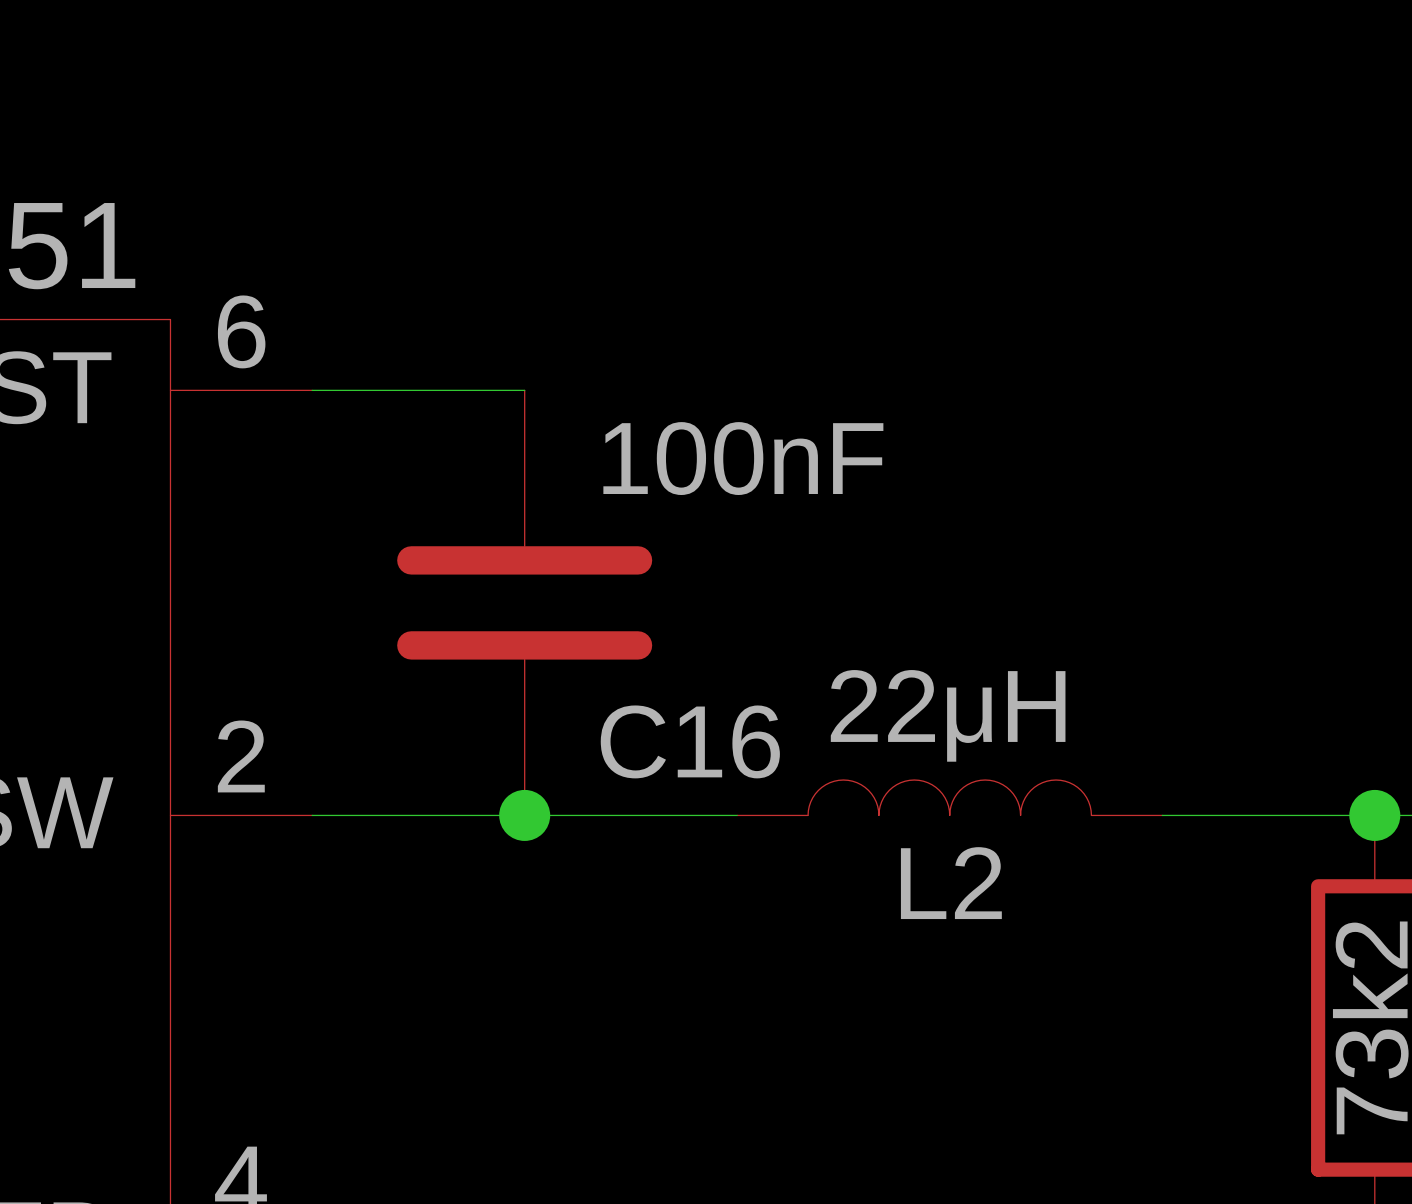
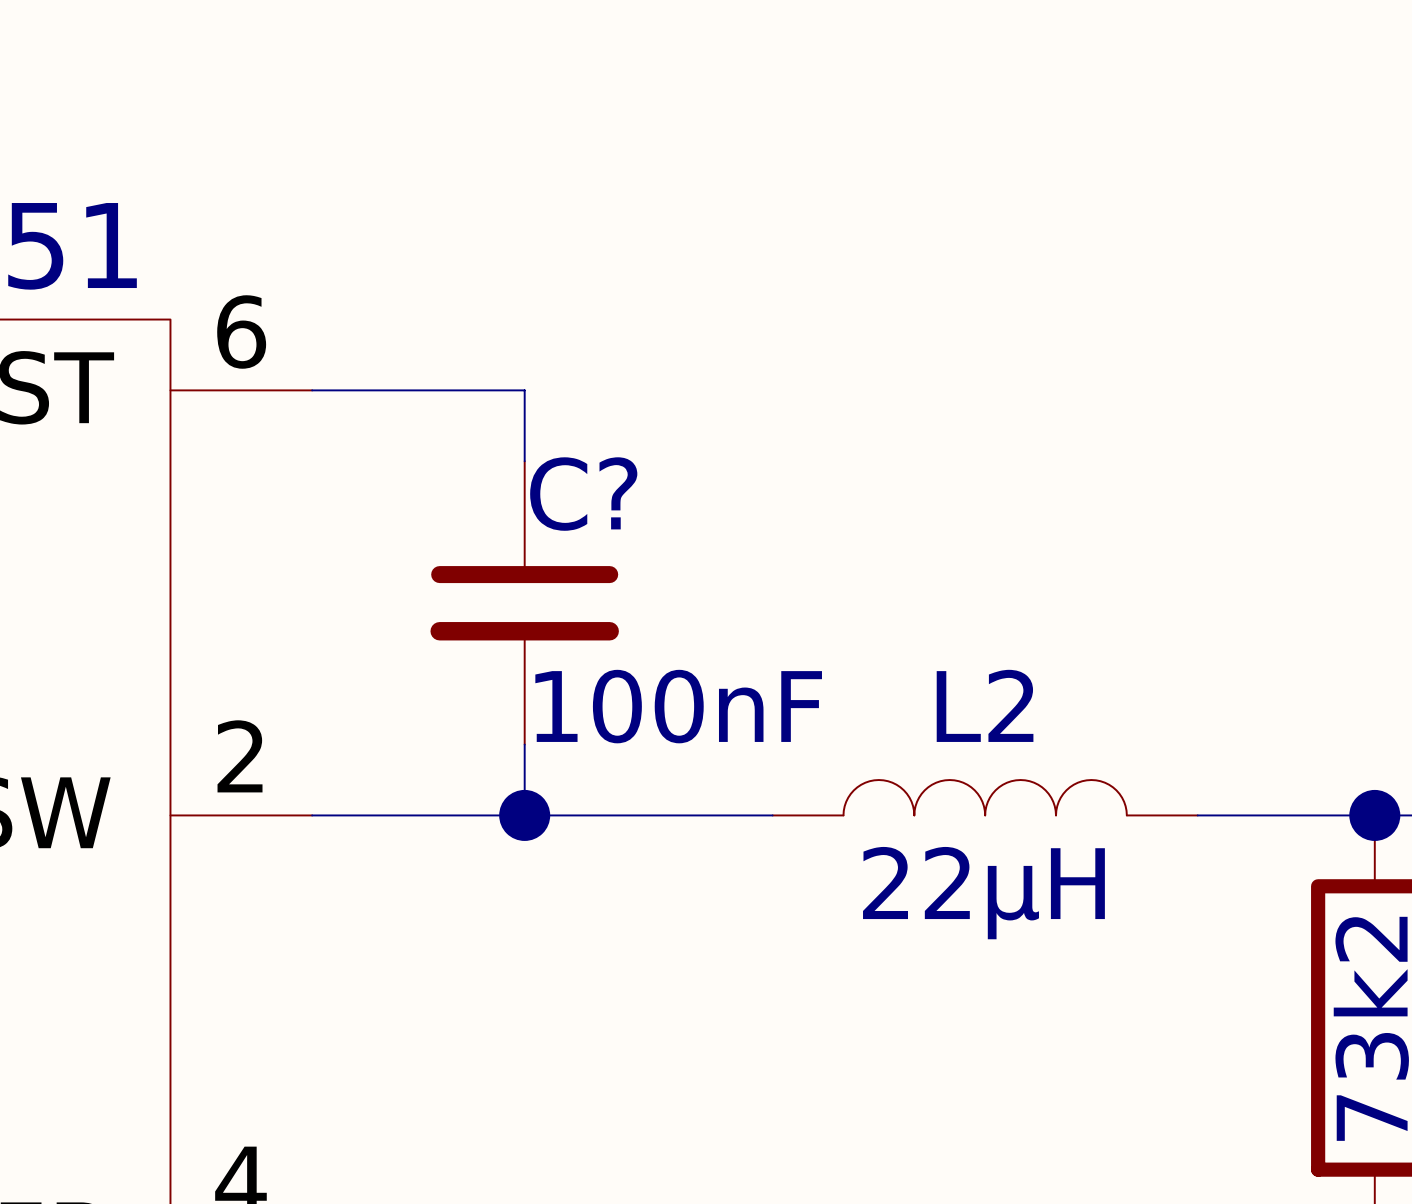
C16: 100nF (524, 602) -> none
C?: none -> 100nF (524, 602)
L2 value position: 22μH (948, 715) -> 22μH (983, 893)
L2 position: (949, 797) -> (985, 797)
L2 name position: L2 (951, 883) -> L2 (985, 705)

